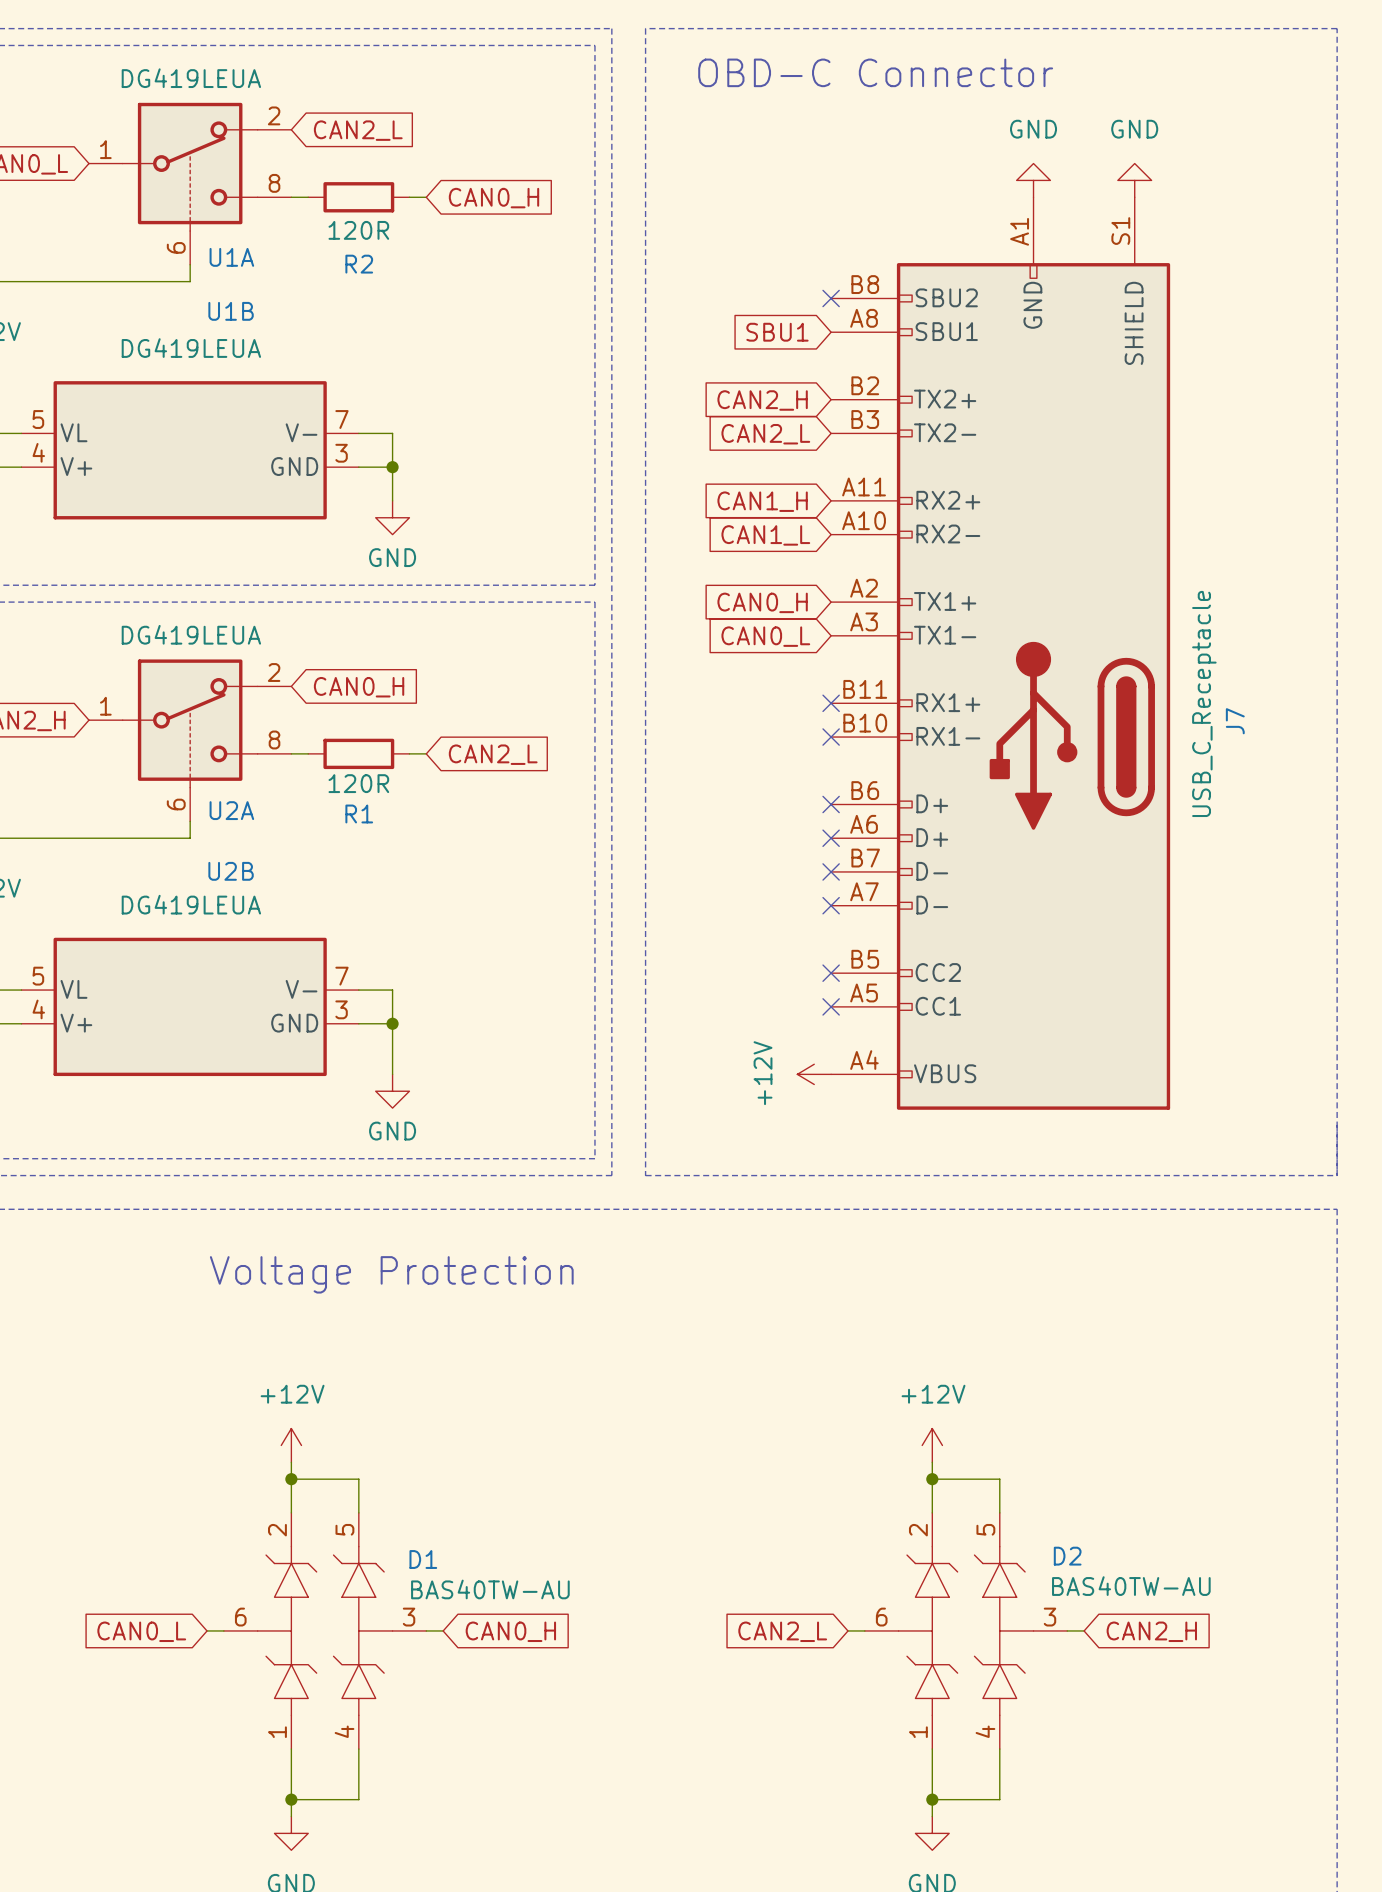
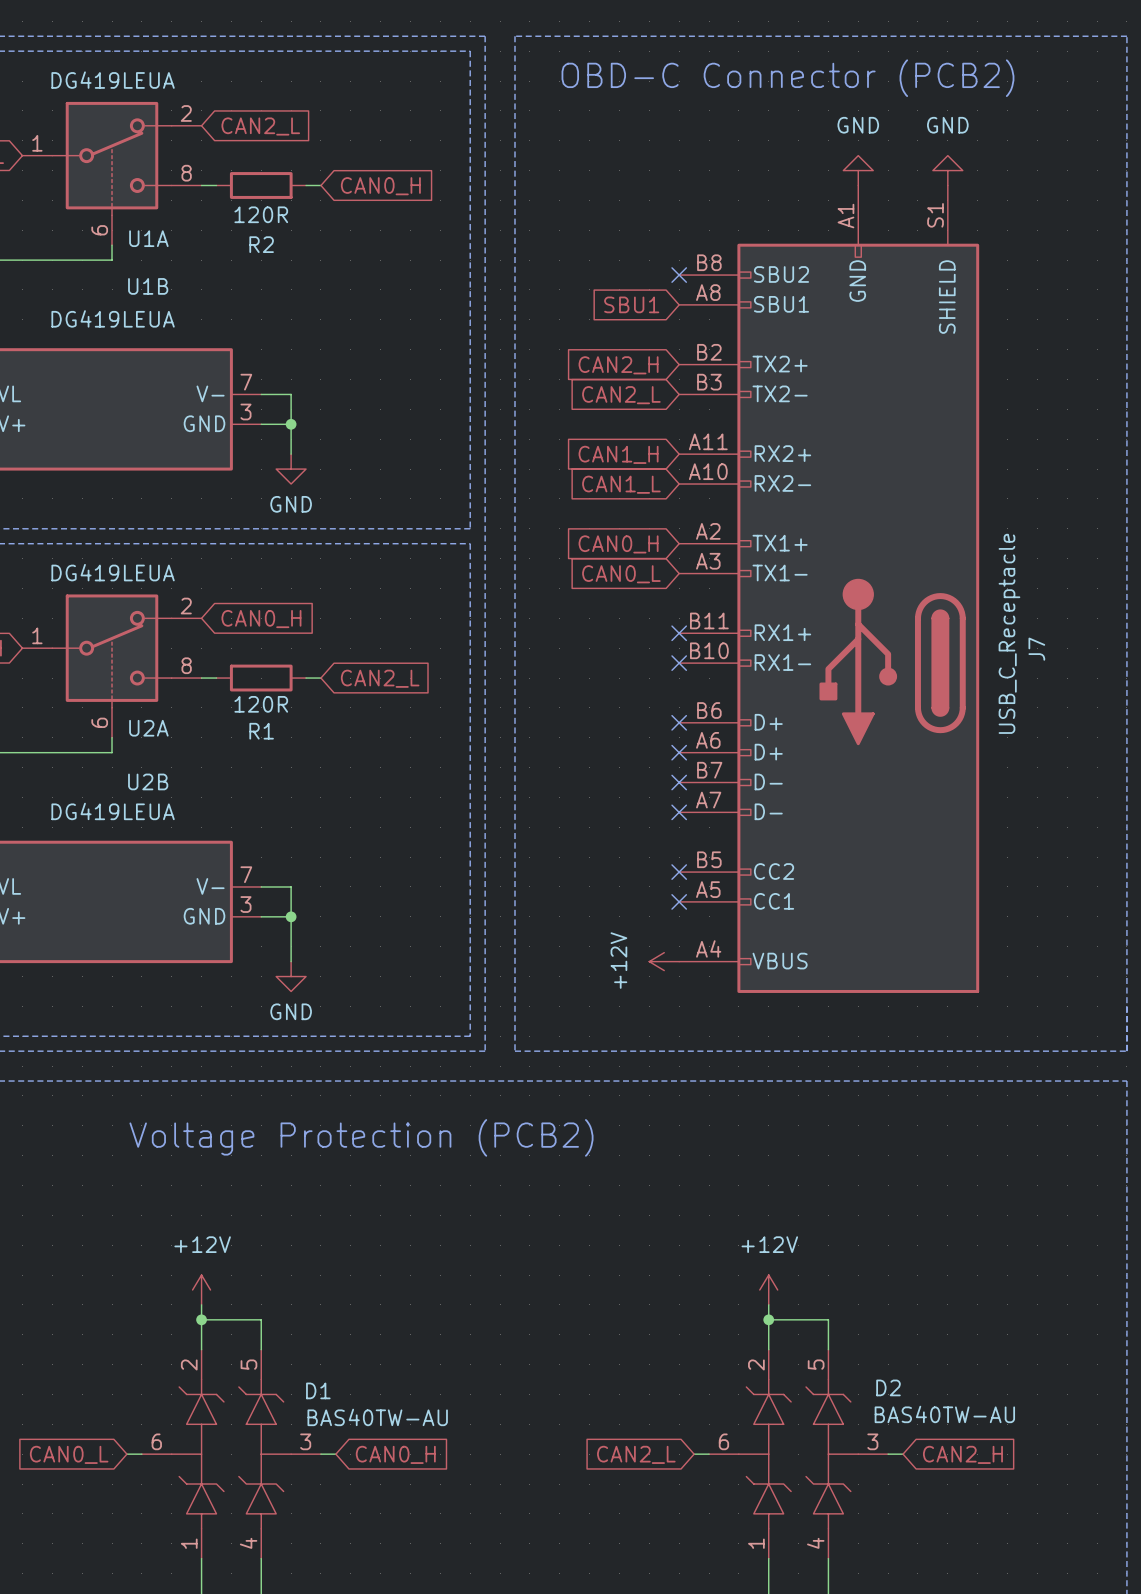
text: OBD-C Connector (875, 72) -> OBD-C Connector (PCB2) (787, 78)
text: Voltage Protection (391, 1274) -> Voltage Protection (PCB2) (361, 1137)

